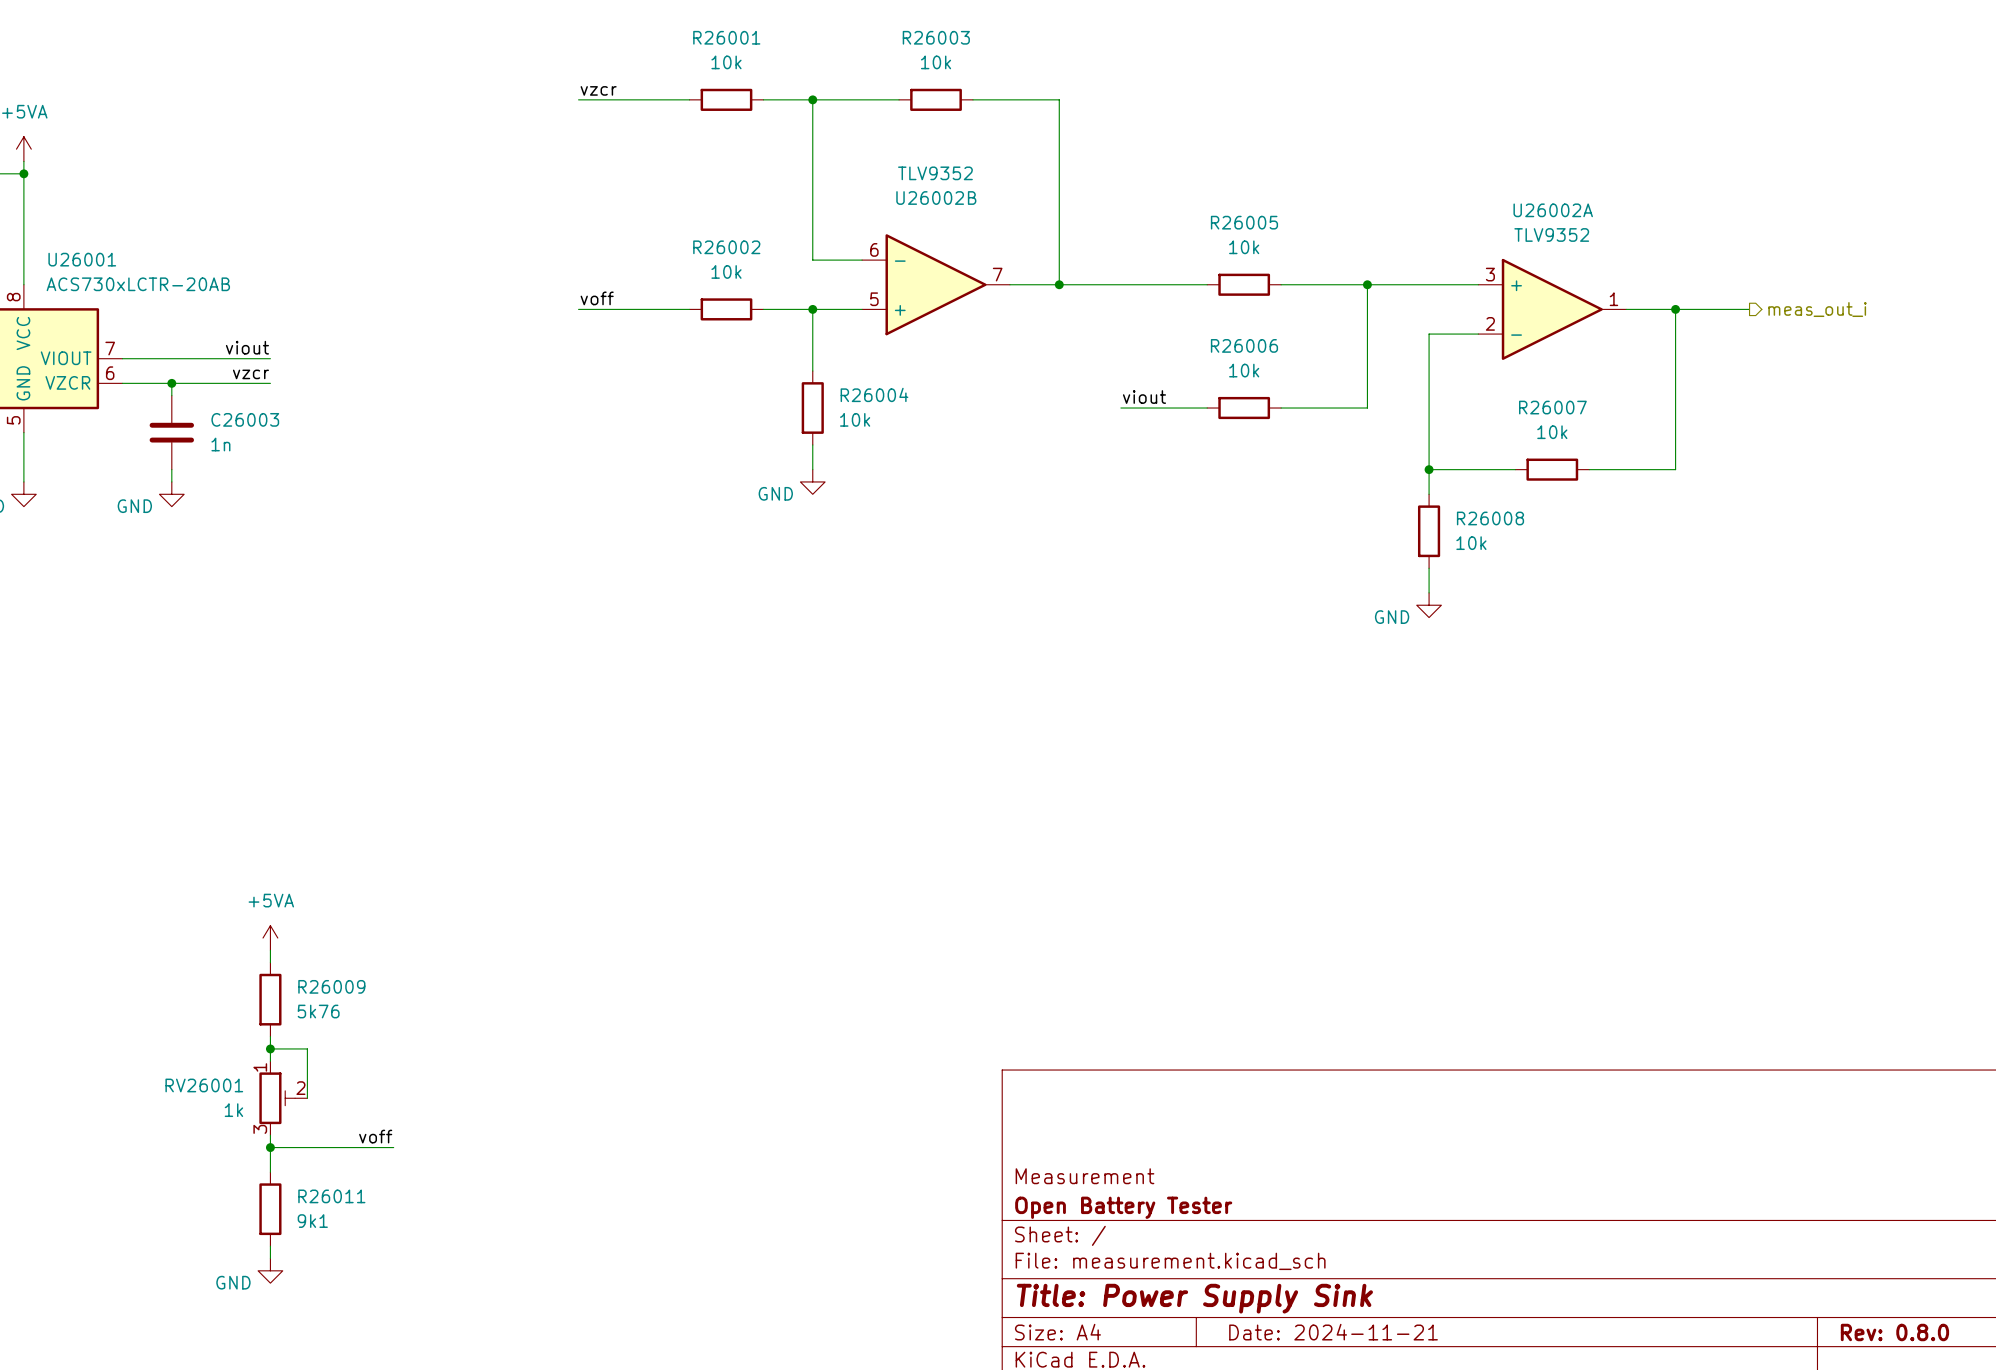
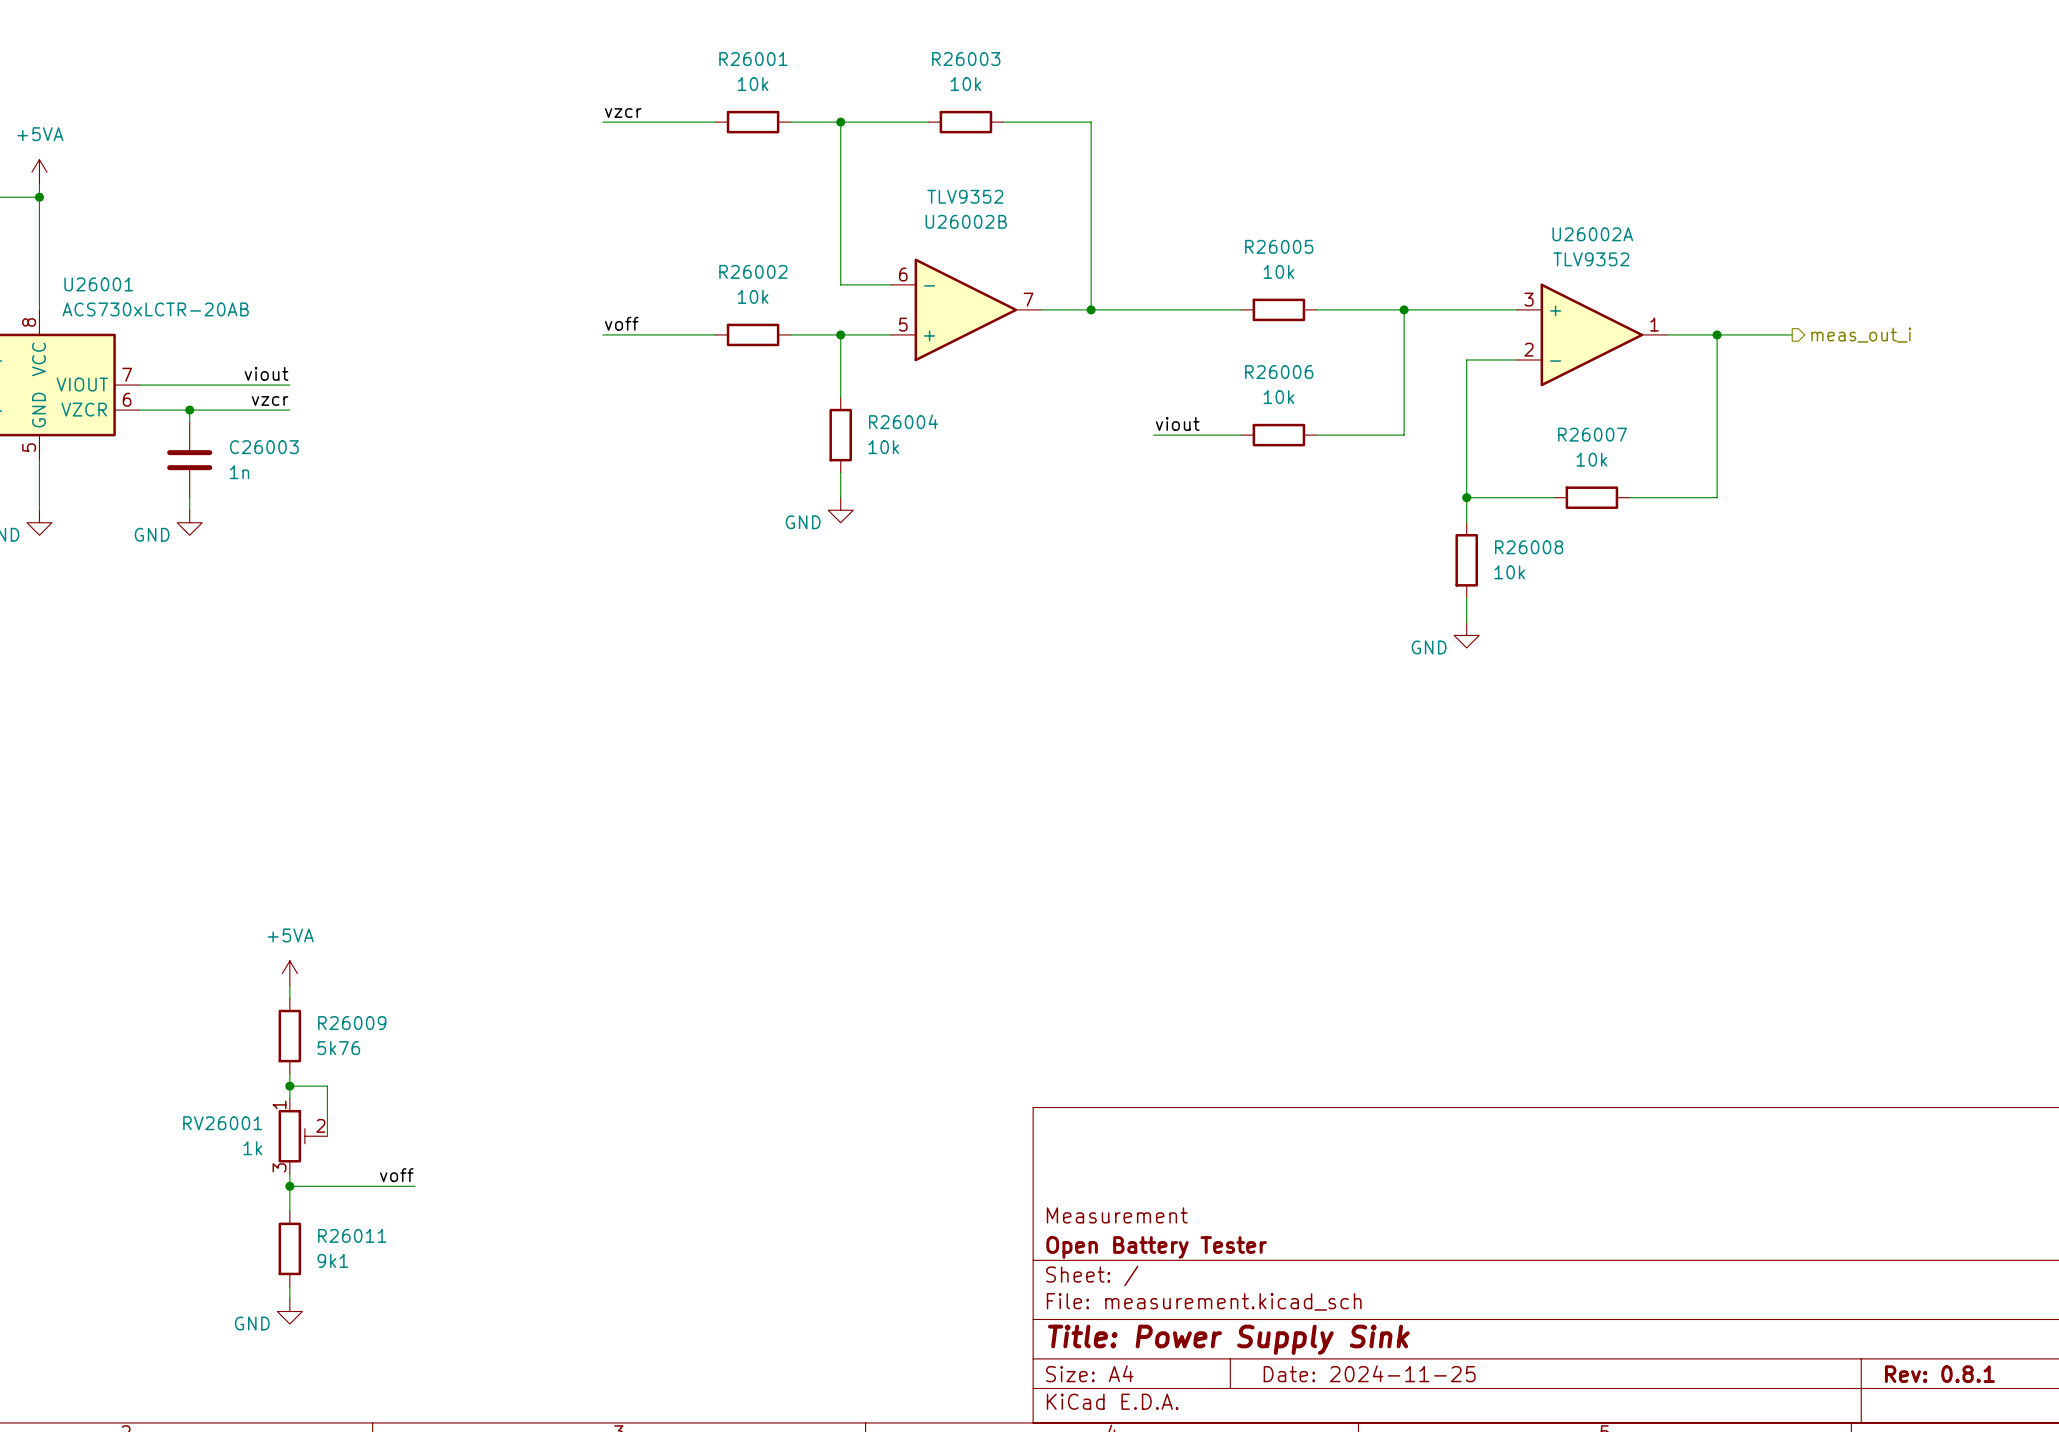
title block: Date: 2024-11-21 (1333, 1332) -> Date: 2024-11-25 (1369, 1373)
title block: Rev: 0.8.0 (1894, 1332) -> Rev: 0.8.1 (1939, 1374)

